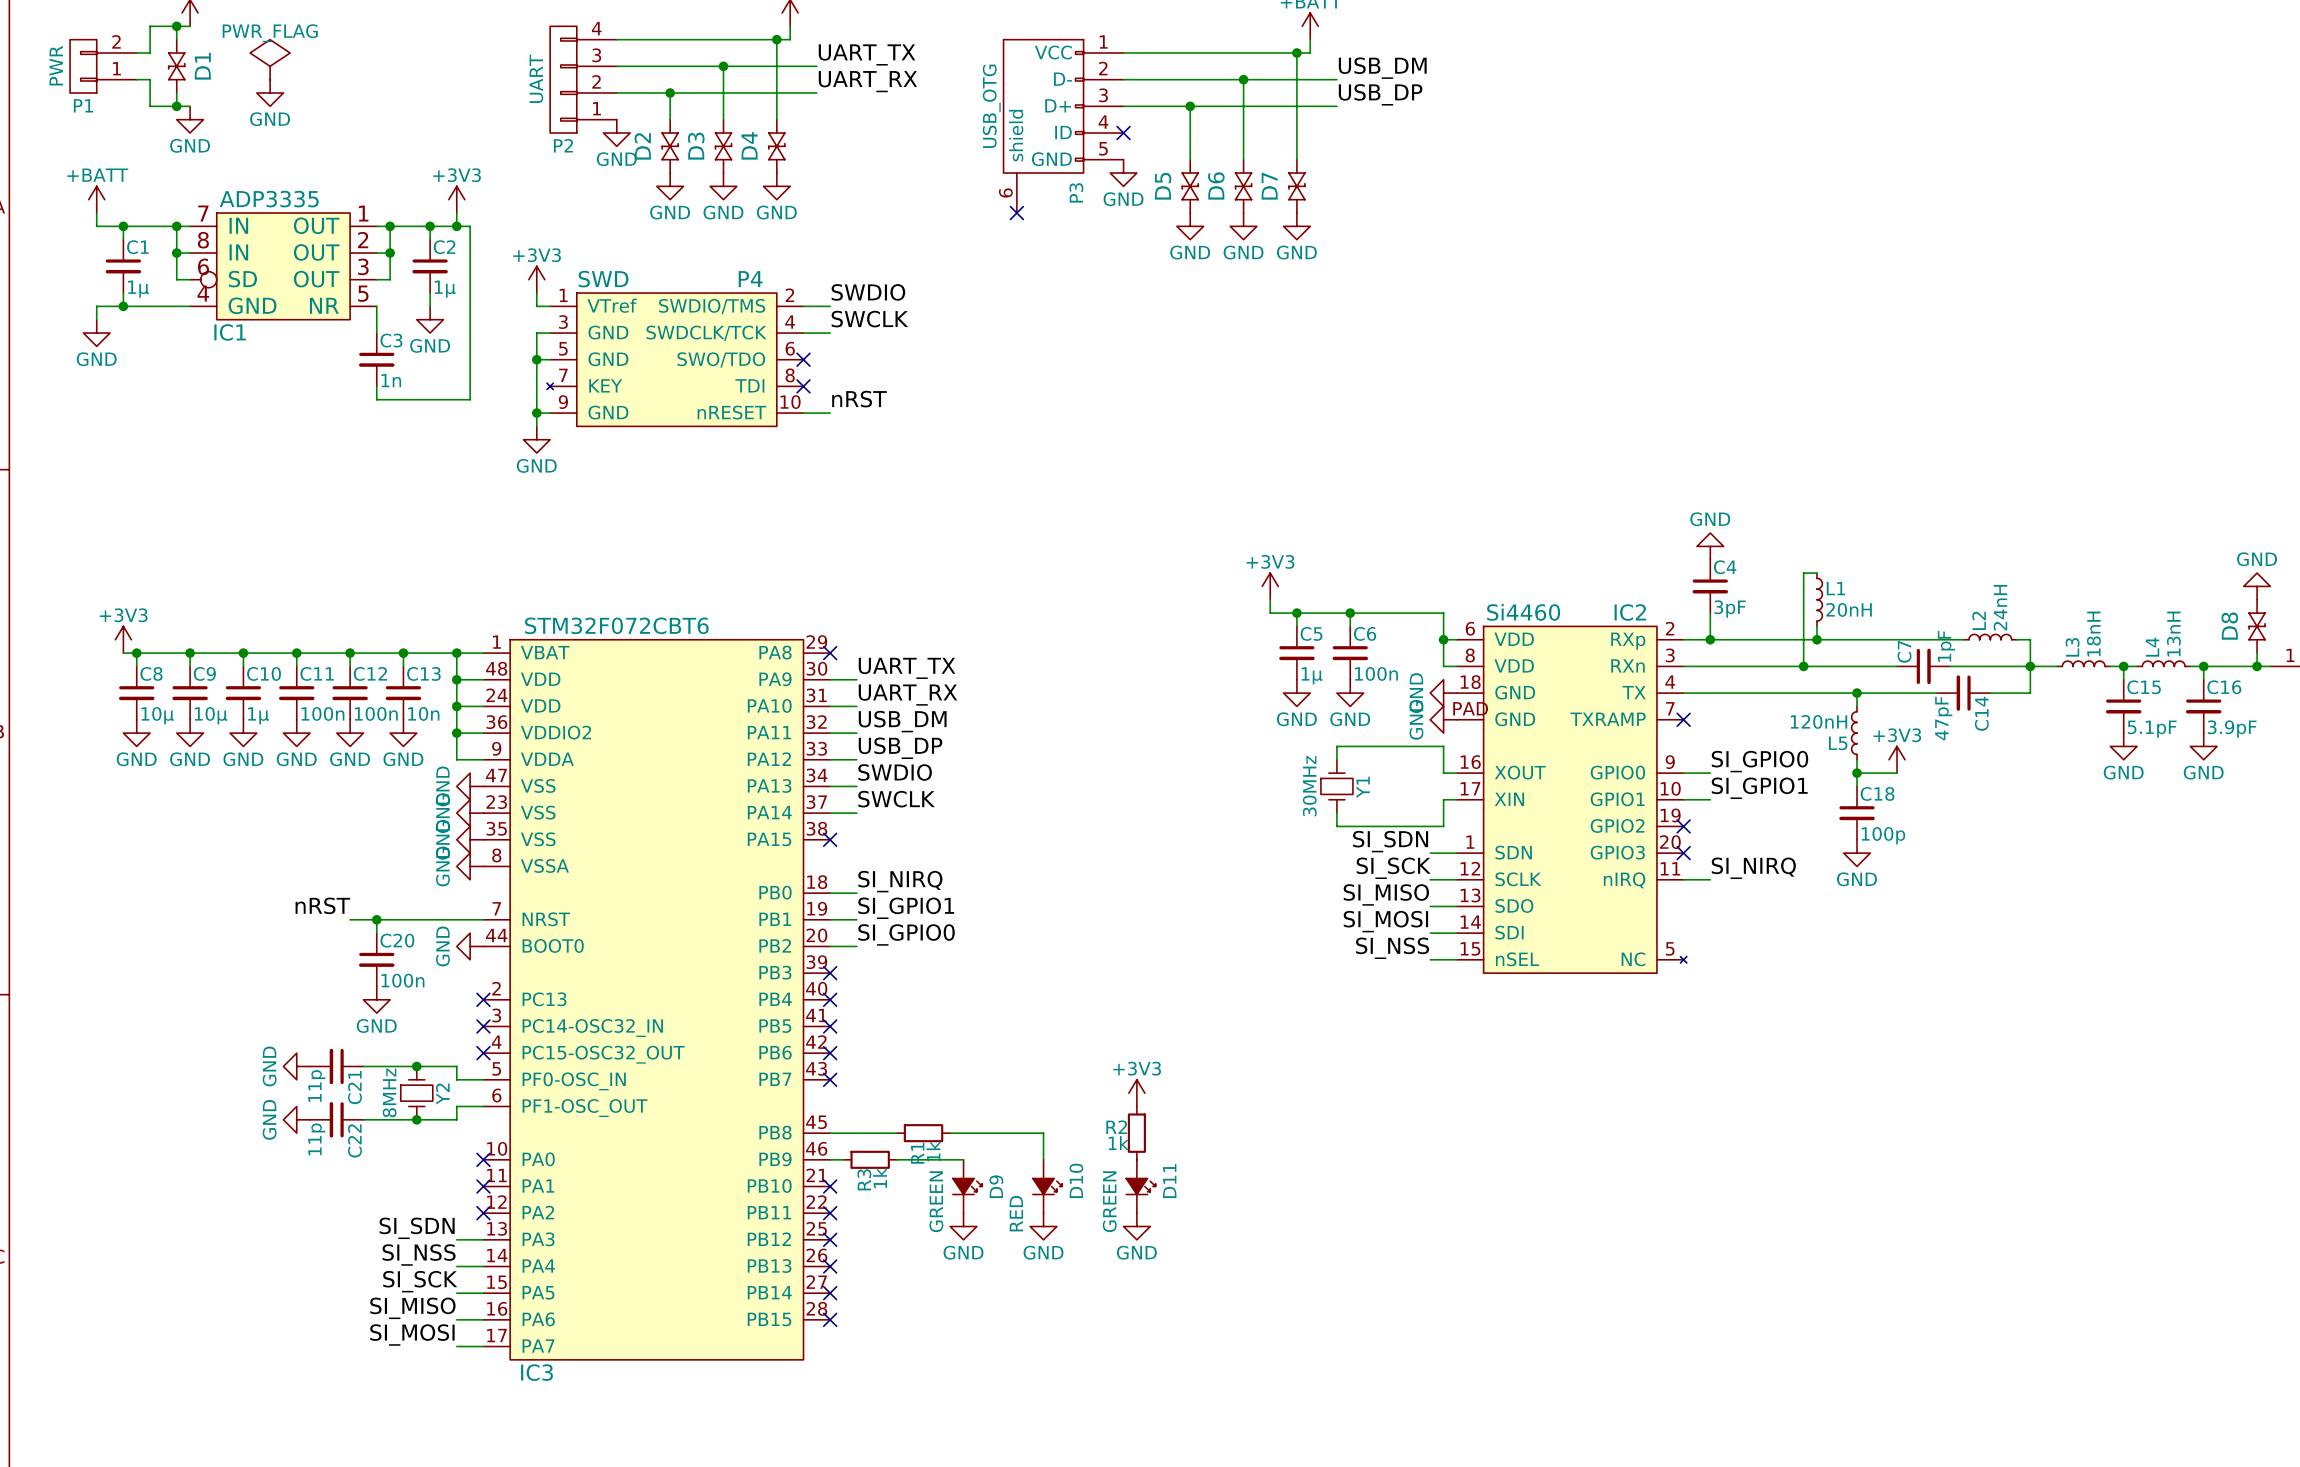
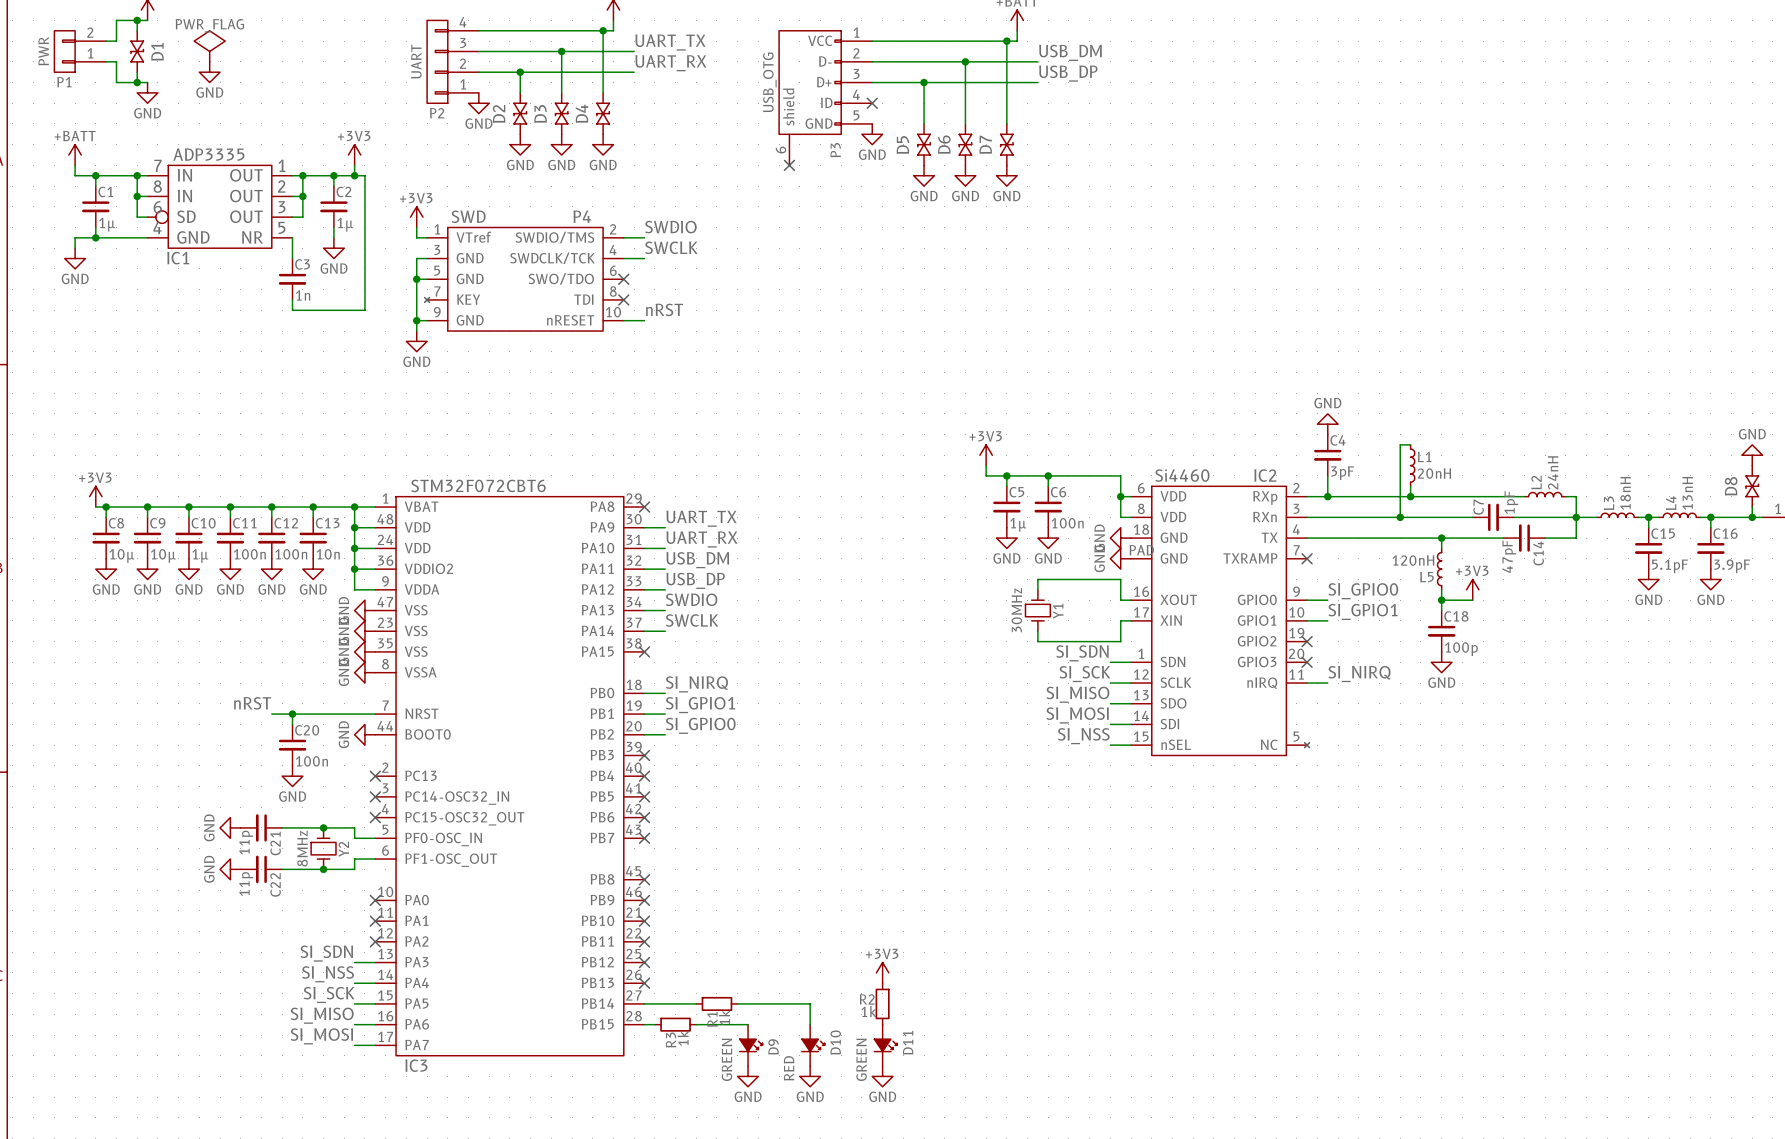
power symbol position: +3V3 (1136, 1093) -> +3V3 (882, 972)
wire: (830, 1133) (896, 1133) -> (644, 1003) (696, 1003)
no-connect mark: none -> (644, 879)
R1 position: (923, 1133) -> (716, 1003)
wire: (950, 1133) (1043, 1133) (1043, 1159) -> (737, 1003) (810, 1003) (810, 1024)
R2 position: (1136, 1133) -> (882, 1003)
wire: (830, 1159) (843, 1159) -> (644, 1024) (654, 1024)
no-connect mark: none -> (644, 900)
R3 position: (870, 1159) -> (675, 1024)
wire: (896, 1159) (963, 1159) -> (696, 1024) (748, 1024)
D9 position: (967, 1186) -> (751, 1045)
D10 position: (1047, 1186) -> (813, 1045)
D11 position: (1140, 1186) -> (885, 1045)
power symbol: GND (963, 1226) -> none
power symbol: GND (1043, 1226) -> none
power symbol: GND (1136, 1226) -> none
no-connect mark: (830, 1293) -> none
no-connect mark: (830, 1319) -> none
power symbol: none -> GND (748, 1076)
power symbol: none -> GND (810, 1076)
power symbol: none -> GND (882, 1076)

